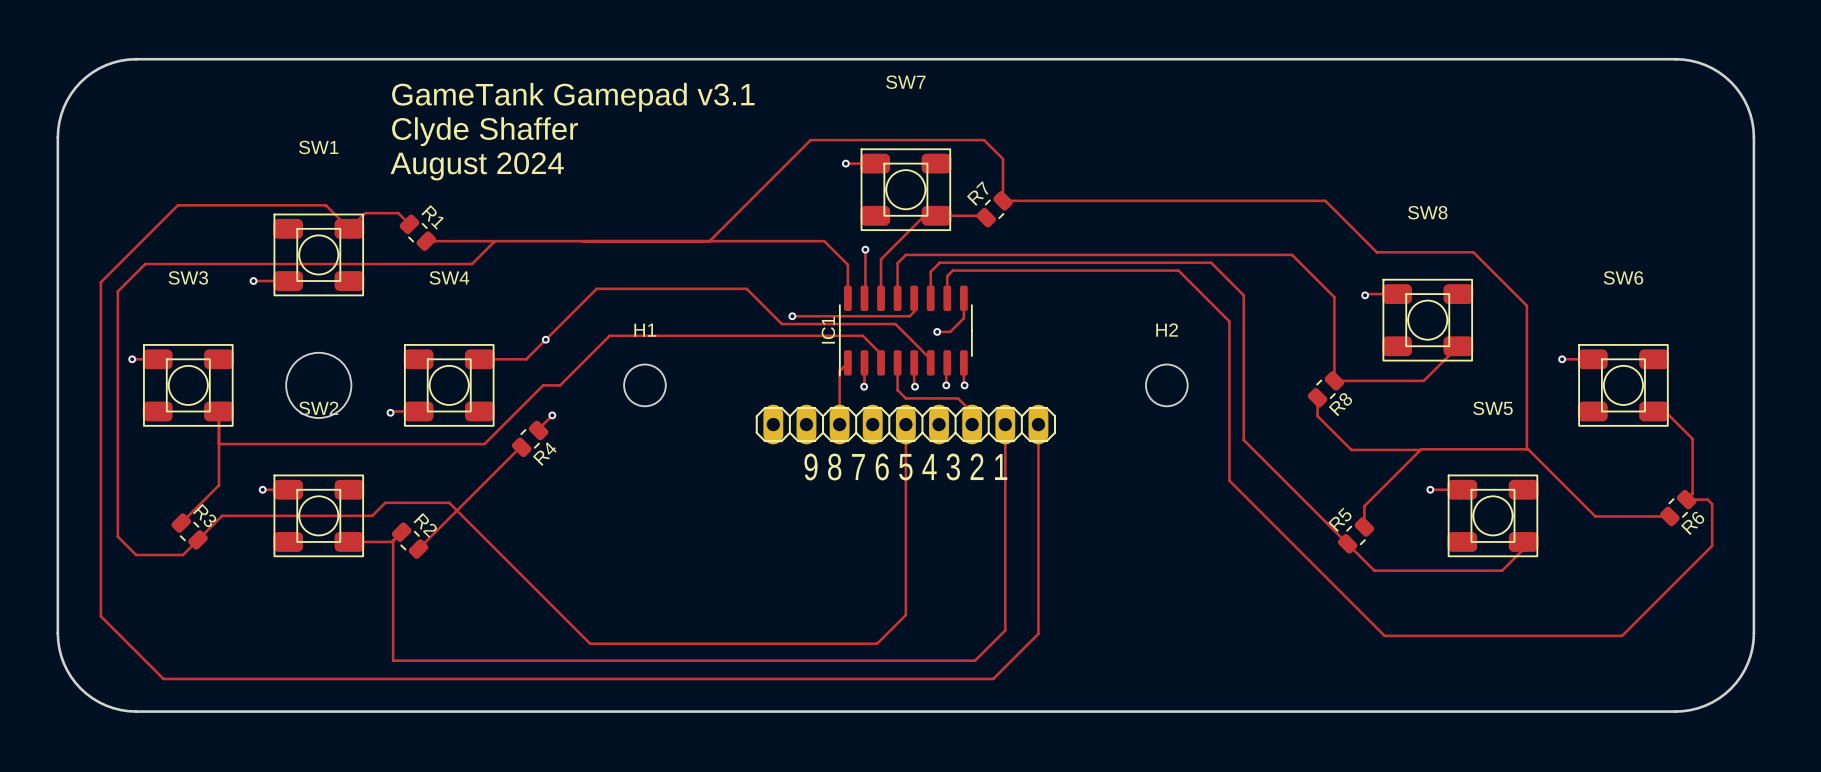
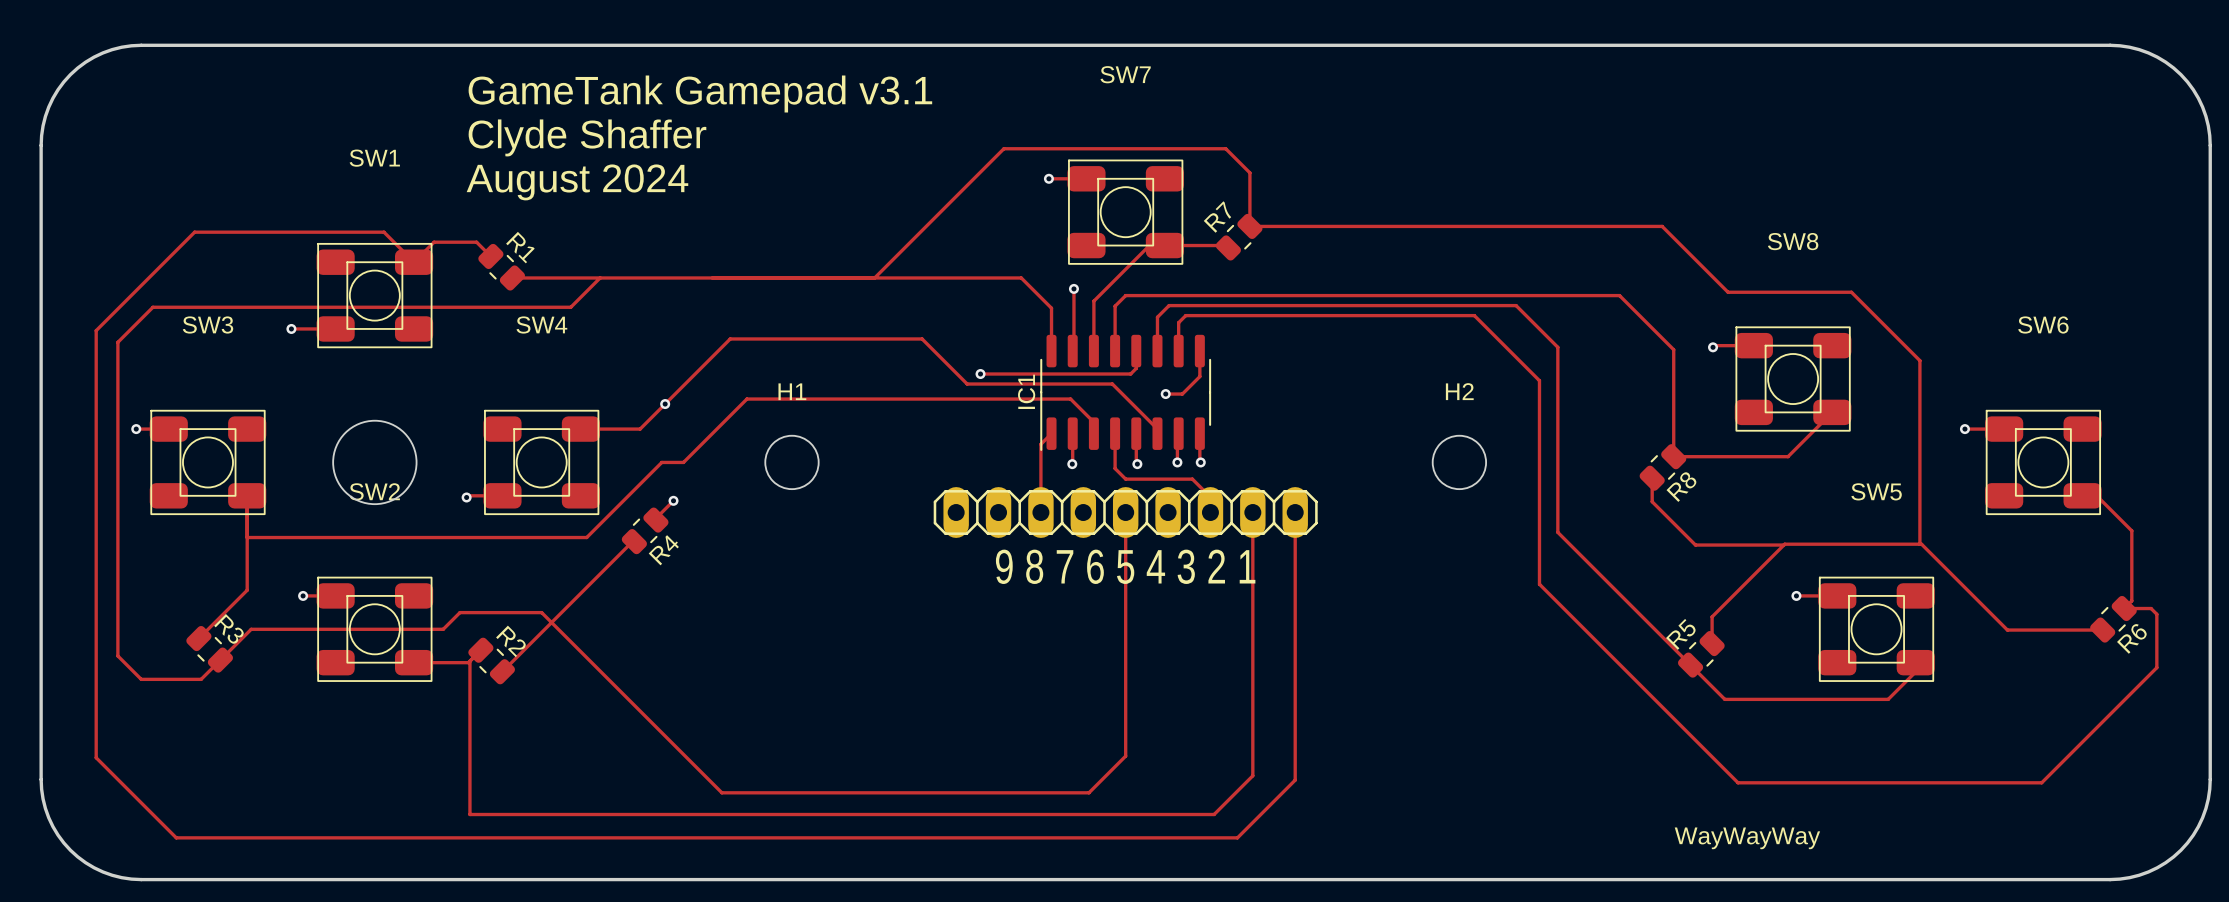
text: none -> WayWayWay (1747, 838)

